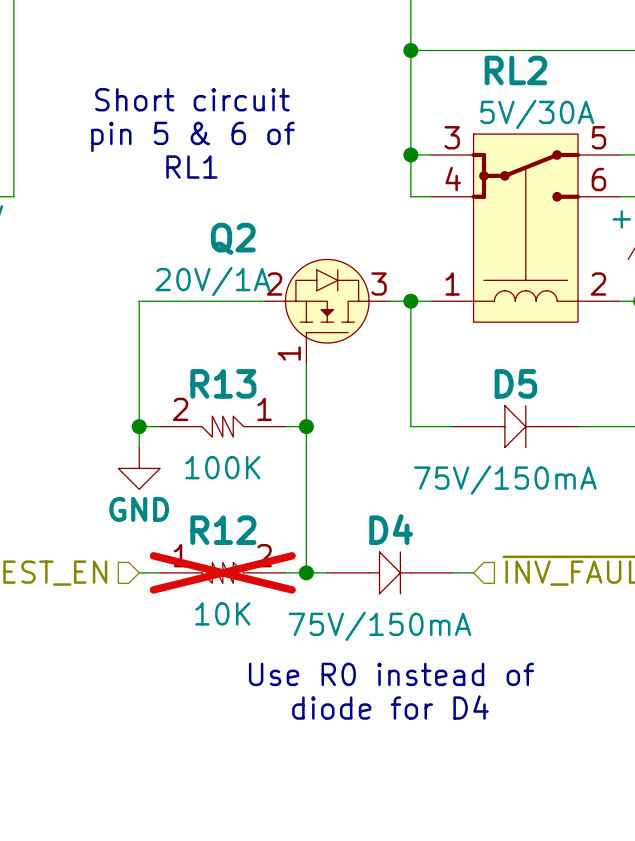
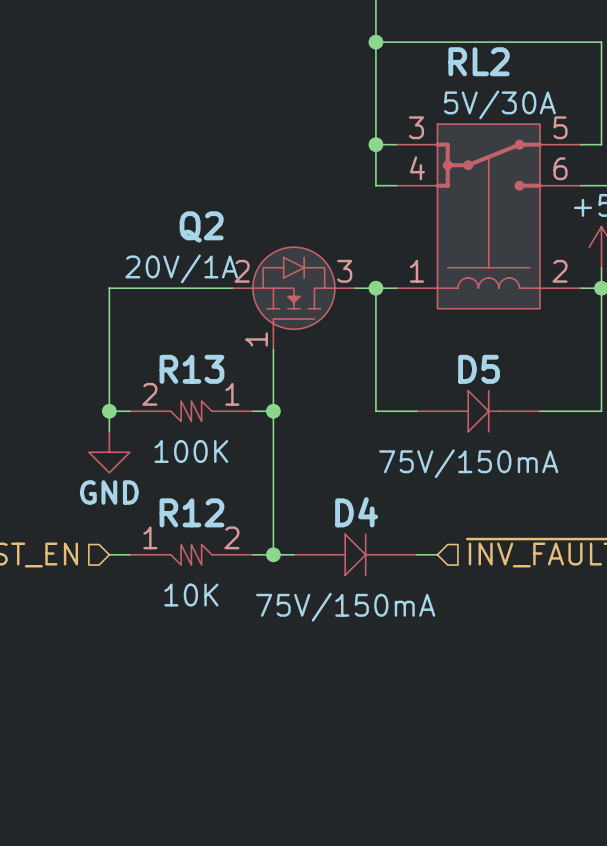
text: Short circuit (192, 99) -> none
text: pin 5 & 6 of (192, 136) -> none
text: RL1 (191, 167) -> none
R12 do-not-place cross: (222, 572) -> none
text: Use R0 instead of (391, 674) -> none
text: diode for D4 (390, 707) -> none

